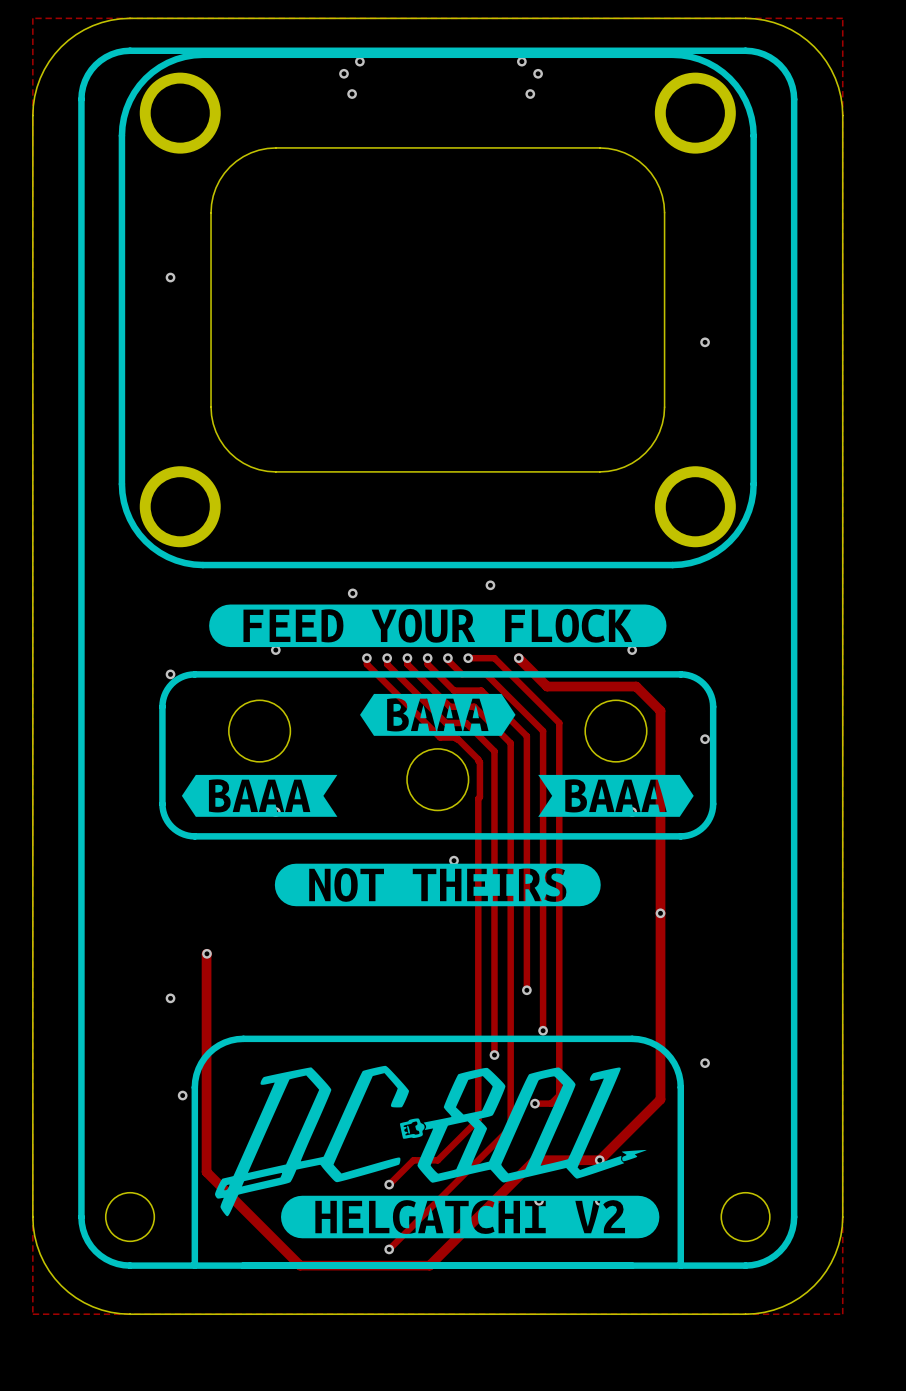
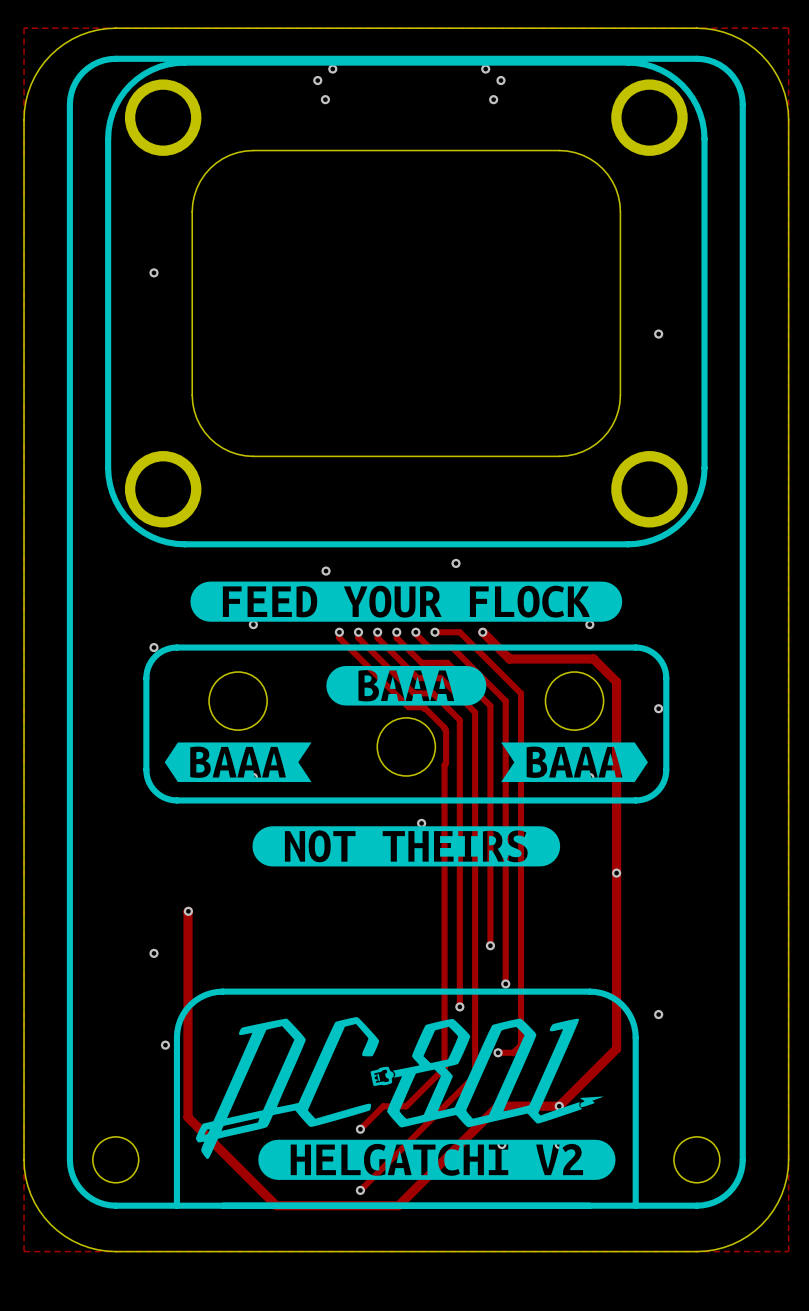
drawing shape: [360, 693, 516, 736] -> [326, 665, 487, 706]

